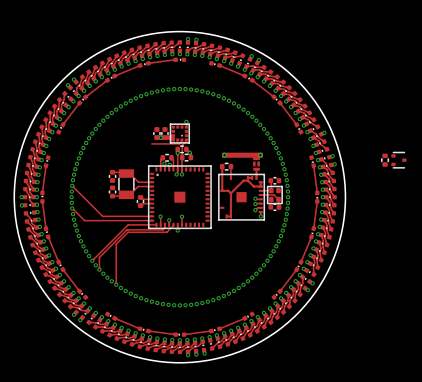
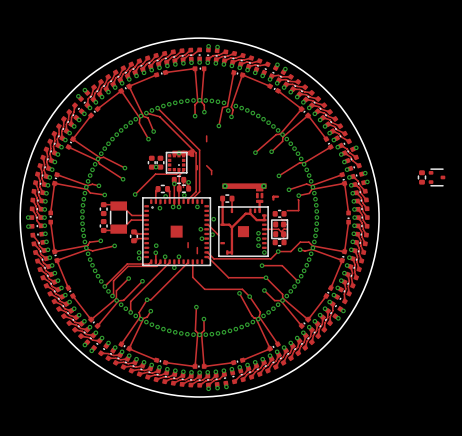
track: none -> (195, 68) (197, 101) (194, 104) (195, 116)
track: none -> (204, 68) (201, 101) (204, 105) (204, 112)
track: none -> (233, 72) (227, 106) (222, 107) (218, 125)
track: none -> (242, 74) (231, 107) (233, 109) (231, 116)
track: none -> (129, 86) (143, 116) (148, 117) (153, 131)
track: none -> (121, 90) (139, 118) (139, 123) (148, 139)
via: (207, 92) -> none
track: none -> (157, 108) (199, 150) (199, 191) (192, 198) (192, 201)
track: none -> (301, 109) (280, 134) (276, 134) (255, 152)
via: none -> (228, 110)
via: none -> (204, 112)
track: none -> (146, 113) (159, 116) (196, 153) (196, 191) (188, 201)
track: none -> (308, 115) (282, 137) (282, 141) (271, 151)
via: none -> (195, 116)
via: none -> (231, 116)
via: none -> (218, 125)
via: none -> (153, 131)
via: (186, 121) -> none
track: none -> (72, 139) (100, 157) (103, 157) (124, 168)
via: none -> (148, 139)
track: none -> (68, 146) (98, 160) (99, 163) (123, 179)
track: none -> (330, 146) (278, 175)
part: (156, 133) -> none
part: (164, 133) -> none
part position: (179, 133) -> (176, 162)
via: none -> (271, 151)
via: none -> (255, 152)
track: (186, 139) (182, 145) (182, 174) -> (183, 169) (179, 175) (178, 206)
track: (182, 140) (179, 143) (151, 143) -> none
part: none -> (151, 162)
part: none -> (160, 162)
track: (177, 149) (176, 174) -> (174, 179) (173, 207)
part: (182, 149) -> none
via: none -> (156, 167)
via: none -> (124, 168)
via: (189, 152) -> none
via: (177, 153) -> none
track: none -> (178, 171) (176, 174) (155, 174) (135, 194)
track: none -> (56, 174) (87, 185) (98, 185)
track: (162, 157) (160, 159) (160, 167) -> (158, 188) (155, 191) (155, 199)
part: (167, 157) -> none
track: (171, 157) (173, 159) (173, 167) -> (167, 188) (169, 191) (169, 199)
part: (186, 157) -> none
track: none -> (342, 174) (311, 185) (306, 184) (288, 189)
via: none -> (278, 175)
via: none -> (123, 179)
part position: (242, 161) -> (244, 193)
part: none -> (178, 179)
via: (164, 163) -> none
track: none -> (54, 183) (104, 194)
track: none -> (344, 183) (311, 189) (309, 193) (298, 195)
via: none -> (174, 183)
track: (222, 166) (222, 190) (228, 190) (230, 193) -> (222, 198) (222, 224) (229, 224) (231, 227)
part: (226, 166) -> none
track: (230, 166) (230, 177) -> (232, 198) (232, 210)
via: none -> (98, 185)
track: (256, 169) (256, 177) -> (259, 201) (259, 210)
part: none -> (162, 188)
part: none -> (183, 188)
via: none -> (288, 189)
track: (112, 172) (129, 173) (138, 182) (152, 182) -> (103, 204) (122, 206) (131, 215) (146, 215)
via: (176, 174) -> none
via: (182, 174) -> none
via: none -> (135, 194)
via: none -> (104, 194)
part: (112, 176) -> none
via: none -> (184, 195)
via: none -> (298, 195)
via: none -> (165, 196)
part: none -> (227, 198)
part: (274, 180) -> none
track: (260, 182) (260, 186) (253, 186) (247, 180) (243, 180) (230, 193) -> (264, 215) (264, 220) (256, 220) (250, 213) (245, 213) (231, 227)
part position: (126, 184) -> (118, 217)
track: (72, 185) (102, 216) (152, 216) -> none
track: (152, 186) (138, 186) (129, 194) (112, 196) -> (146, 220) (131, 220) (122, 229) (103, 230)
via: none -> (173, 207)
via: none -> (178, 207)
via: none -> (197, 206)
via: none -> (159, 208)
part: none -> (103, 209)
part: (112, 191) -> none
track: (230, 193) (230, 216) (226, 216) -> (231, 227) (231, 252) (227, 252)
part: none -> (279, 213)
track: (260, 195) (274, 195) (278, 199) (278, 207) -> (264, 229) (278, 229) (283, 234) (284, 242)
part position: (274, 195) -> (279, 229)
track: (140, 197) (142, 199) (150, 199) -> (133, 231) (136, 233) (144, 233)
part position: (179, 197) -> (176, 231)
part position: (241, 197) -> (243, 231)
via: none -> (213, 219)
via: (255, 198) -> none
part: (140, 201) -> none
track: (150, 203) (142, 203) (140, 205) -> (144, 238) (136, 238) (133, 240)
track: none -> (206, 224) (218, 235)
part: none -> (103, 226)
via: (255, 204) -> none
part: (274, 207) -> none
track: (72, 208) (84, 220) (152, 220) -> none
via: none -> (200, 229)
via: (255, 210) -> none
via: none -> (258, 233)
via: none -> (212, 234)
part: none -> (133, 236)
track: (160, 216) (160, 224) -> (155, 252) (155, 261)
via: (160, 216) -> none
track: (182, 216) (182, 224) -> none
via: (260, 216) -> none
via: none -> (258, 239)
track: none -> (100, 240) (54, 251)
via: none -> (100, 240)
via: (169, 220) -> none
part: none -> (279, 242)
track: none -> (114, 245) (92, 250) (87, 249) (56, 260)
via: none -> (114, 245)
via: none -> (156, 245)
via: none -> (258, 245)
track: (156, 224) (128, 224) (113, 240) -> (151, 261) (148, 264) (127, 264)
track: (164, 224) (163, 229) (127, 229) (99, 257) (99, 269) -> (160, 261) (156, 266) (128, 266) (113, 280) (112, 296)
track: (173, 224) (166, 232) (128, 232) (116, 244) (116, 274) -> (169, 261) (130, 301)
track: none -> (300, 249) (311, 249) (342, 260)
via: none -> (300, 249)
via: none -> (278, 251)
track: none -> (344, 251) (312, 245) (308, 242) (300, 242) (290, 251) (278, 251) (270, 258) (213, 258) (206, 252)
via: none -> (139, 252)
via: none -> (155, 252)
via: none -> (264, 252)
via: (177, 230) -> none
via: none -> (165, 256)
via: none -> (178, 256)
track: none -> (206, 257) (228, 277) (266, 277)
via: none -> (139, 258)
track: none -> (188, 261) (150, 299) (147, 299) (139, 312) (140, 316) (121, 344)
track: none -> (192, 261) (192, 277) (204, 289) (242, 289) (260, 312) (259, 316) (277, 344)
track: none -> (262, 265) (282, 265) (297, 281)
via: none -> (262, 265)
via: none -> (174, 267)
track: none -> (266, 277) (282, 294) (282, 298) (308, 319)
via: none -> (266, 277)
track: none -> (128, 278) (116, 290) (116, 298)
via: none -> (128, 278)
track: none -> (142, 281) (123, 300) (118, 300) (97, 326)
via: none -> (142, 281)
track: none -> (264, 290) (274, 300) (280, 300) (301, 326)
via: none -> (264, 290)
track: none -> (239, 293) (251, 315) (255, 318) (270, 348)
via: none -> (239, 293)
via: none -> (249, 296)
track: none -> (116, 298) (91, 319)
via: none -> (147, 299)
track: none -> (196, 307) (195, 330) (197, 332) (195, 366)
via: none -> (196, 307)
track: none -> (150, 311) (147, 317) (143, 318) (129, 348)
via: none -> (150, 311)
track: none -> (203, 319) (204, 330) (201, 332) (204, 366)
via: none -> (203, 319)

